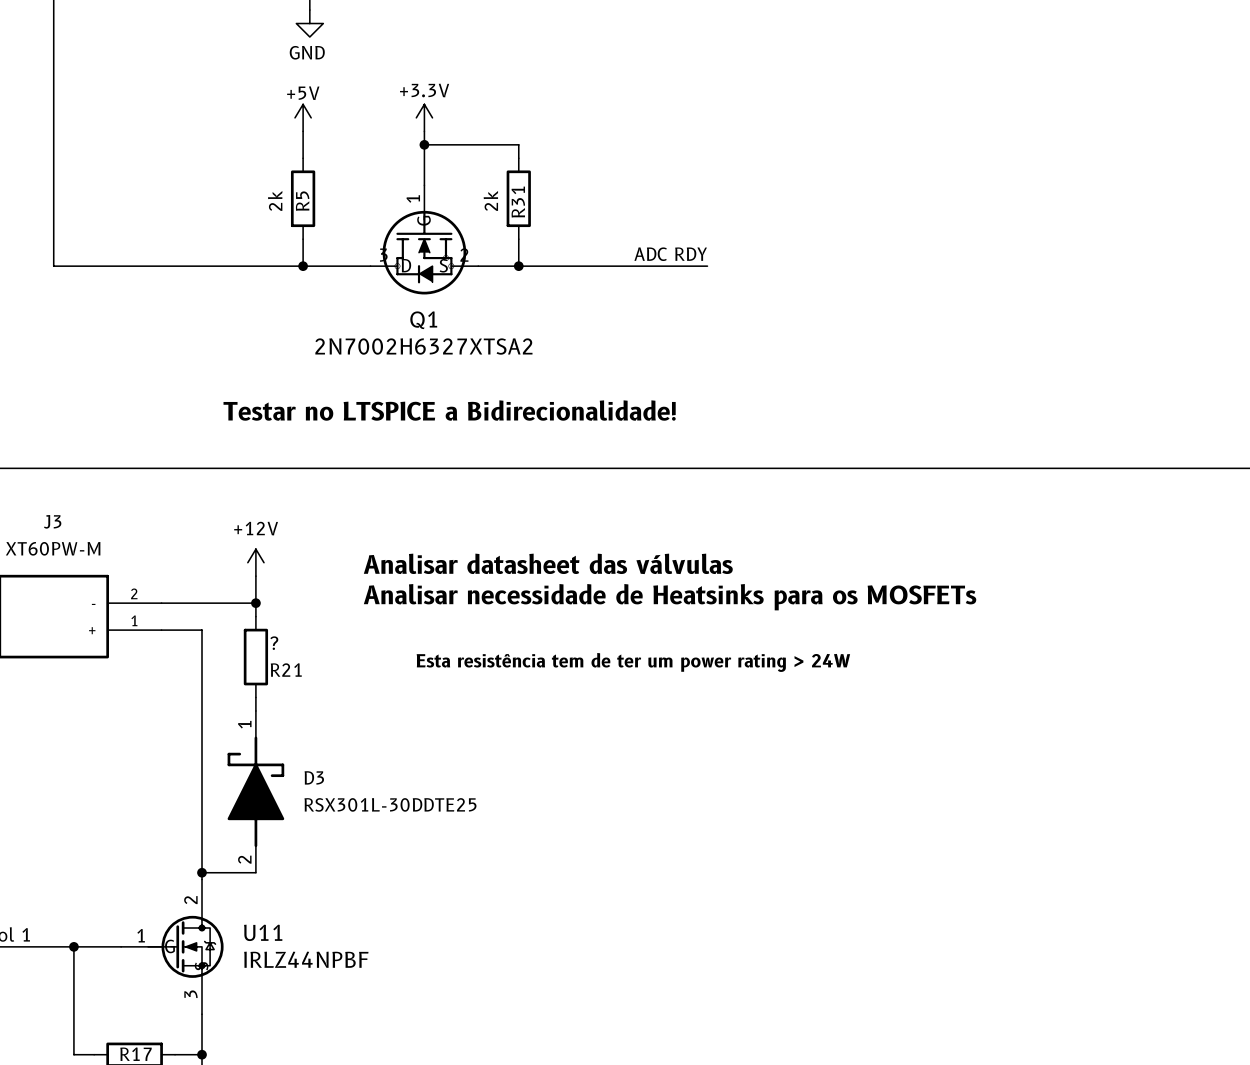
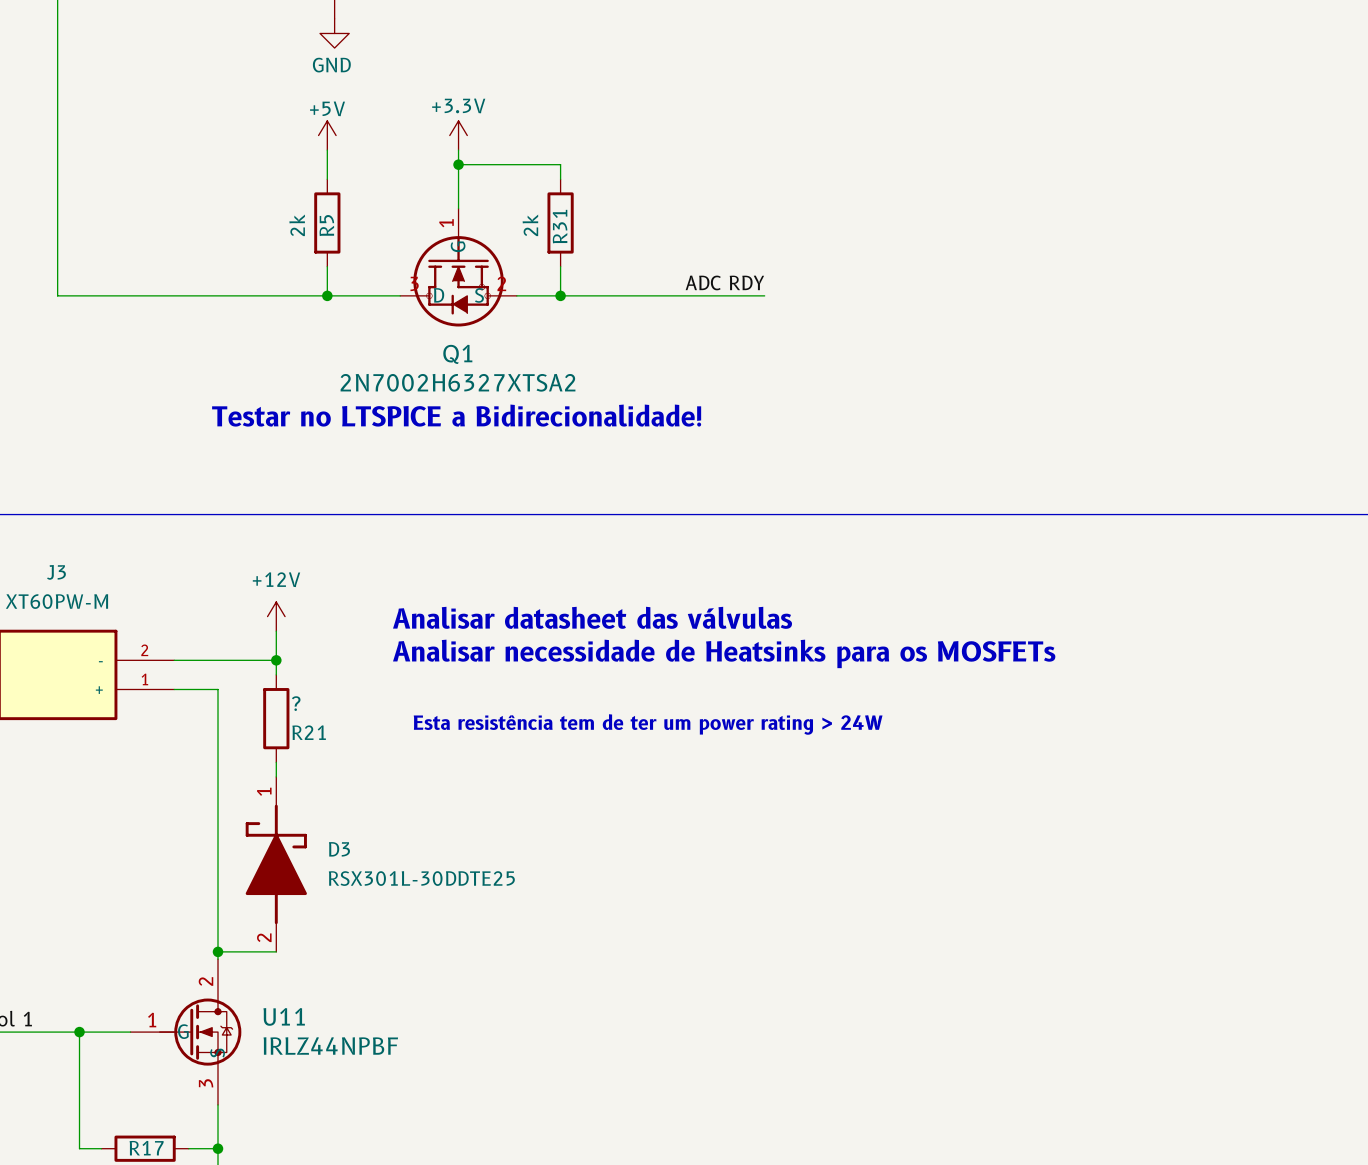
text position: Testar no LTSPICE a Bidirecionalidade! (449, 410) -> Testar no LTSPICE a Bidirecionalidade! (456, 415)
text position: Esta resistência tem de ter um power rating > 24W (633, 662) -> Esta resistência tem de ter um power rating > 24W (648, 724)

